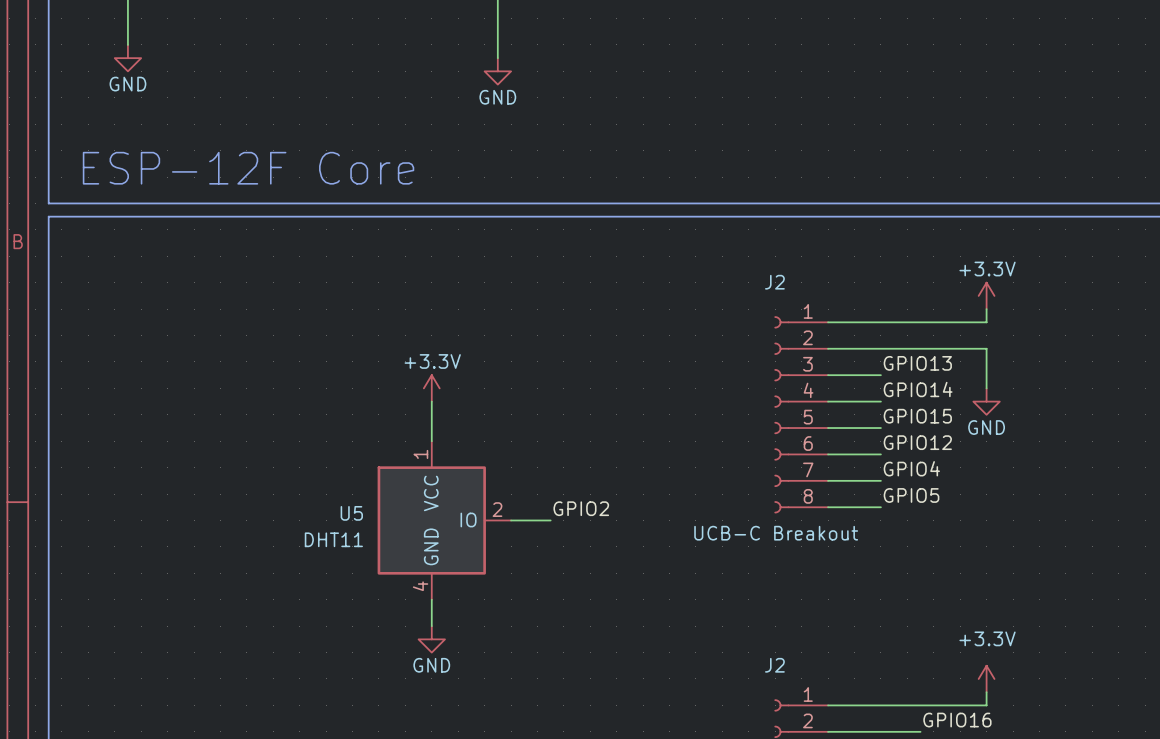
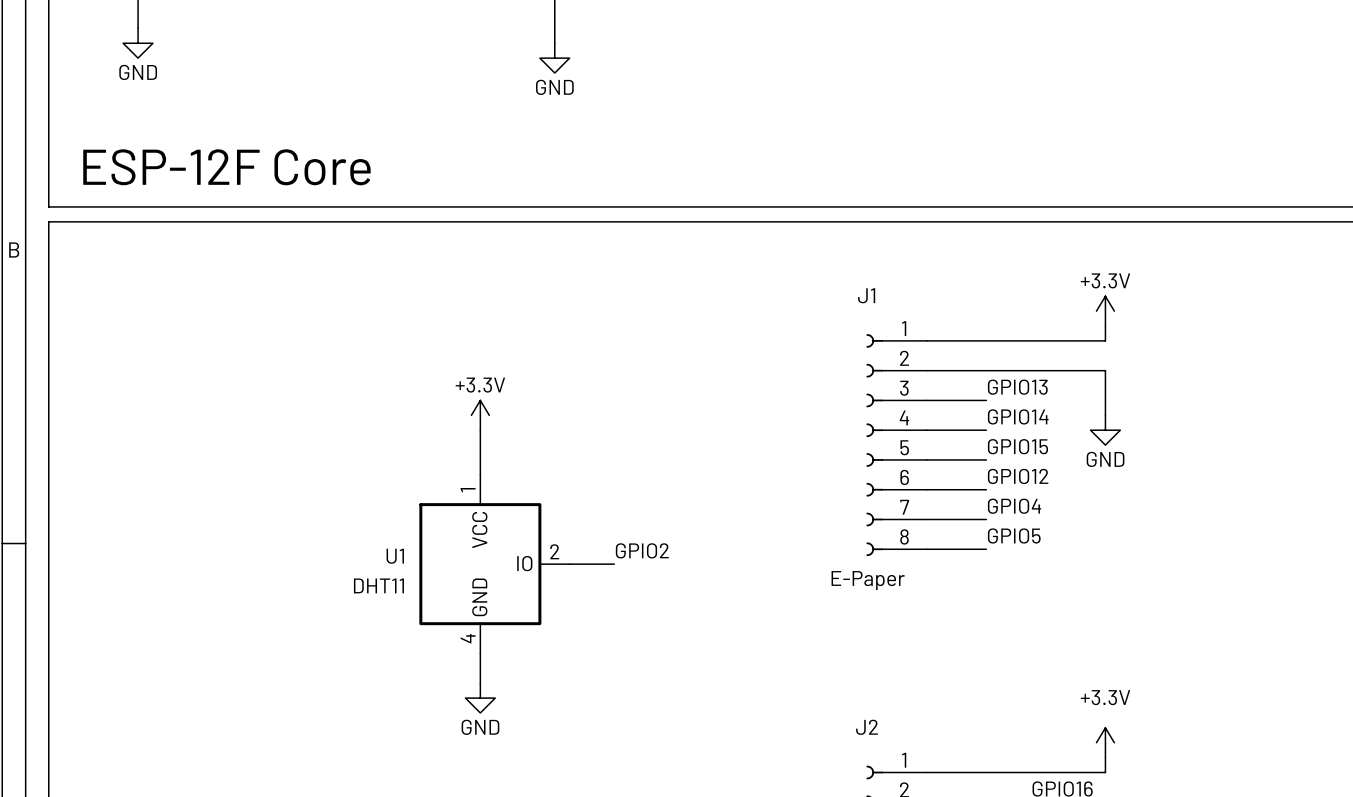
J2: UCB-C Breakout (801, 414) -> none
J1: none -> E-Paper (896, 445)
U5 name: U5 (351, 513) -> U1 (395, 556)

